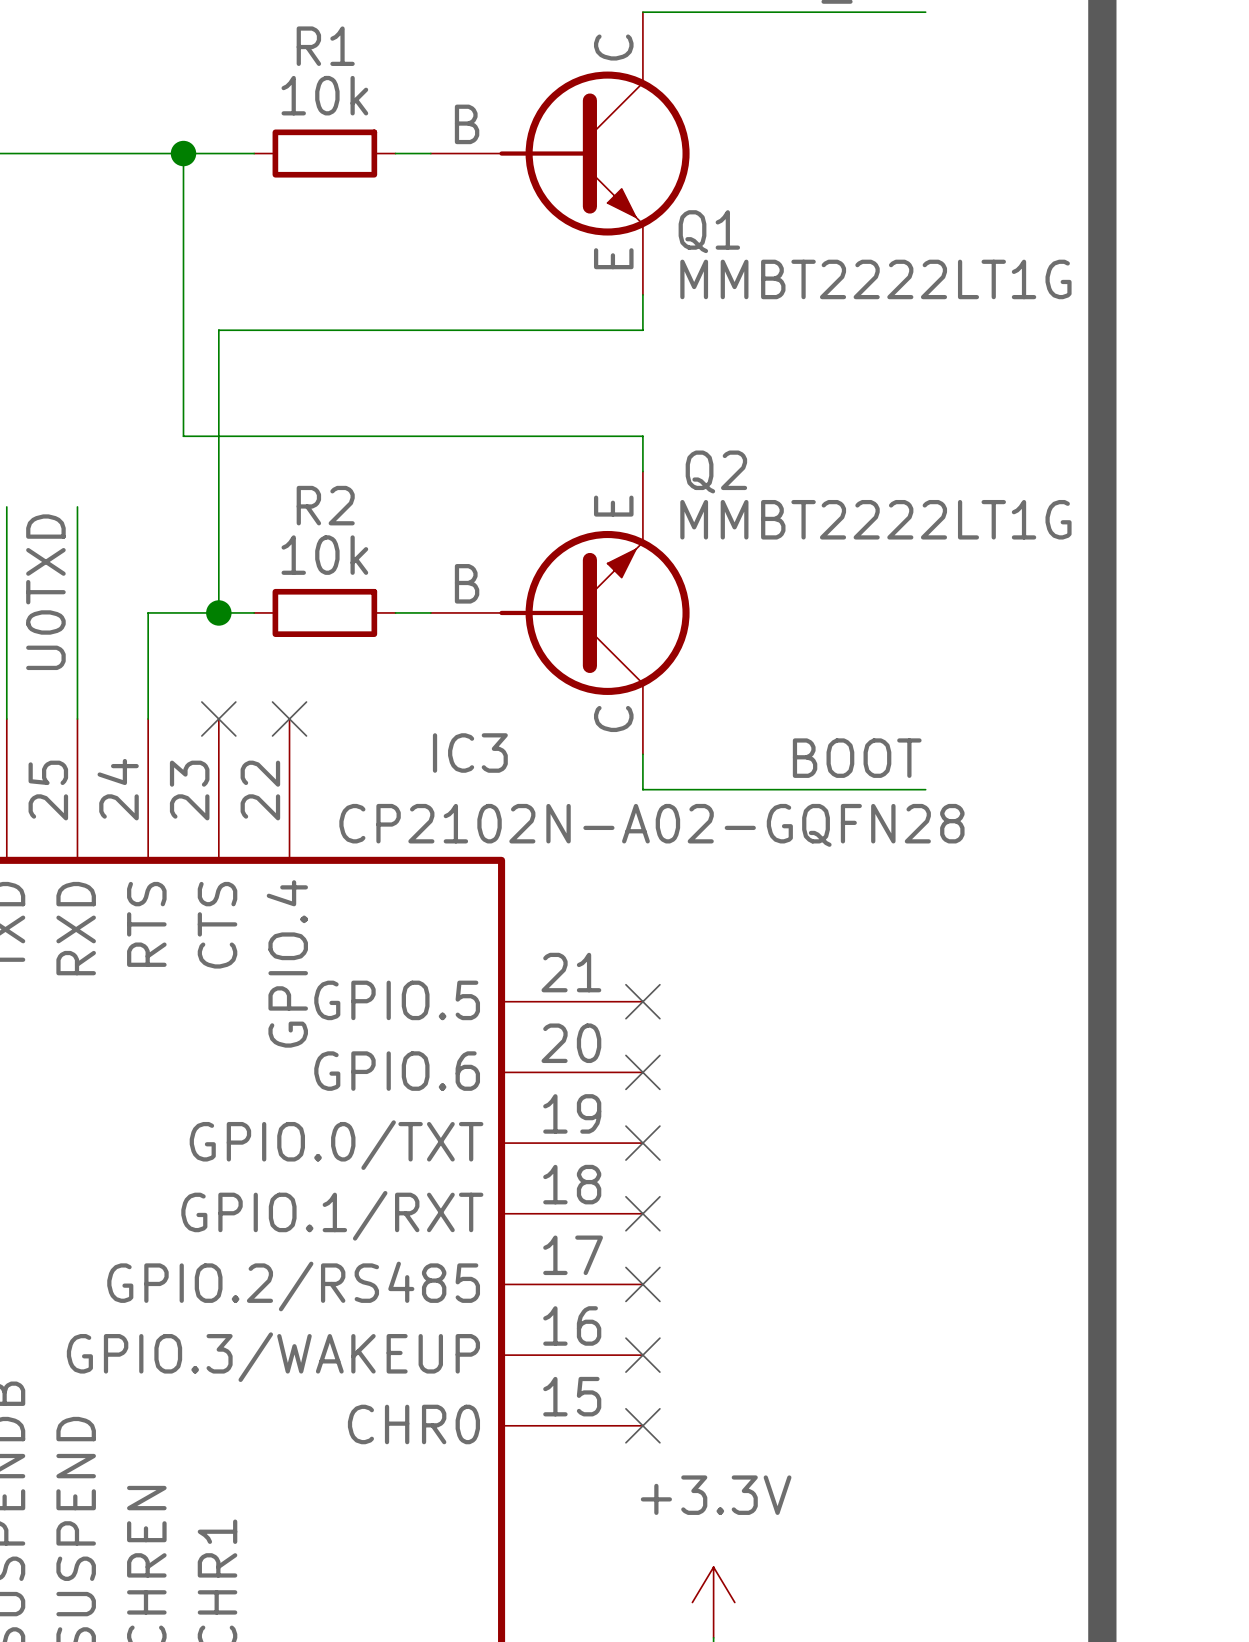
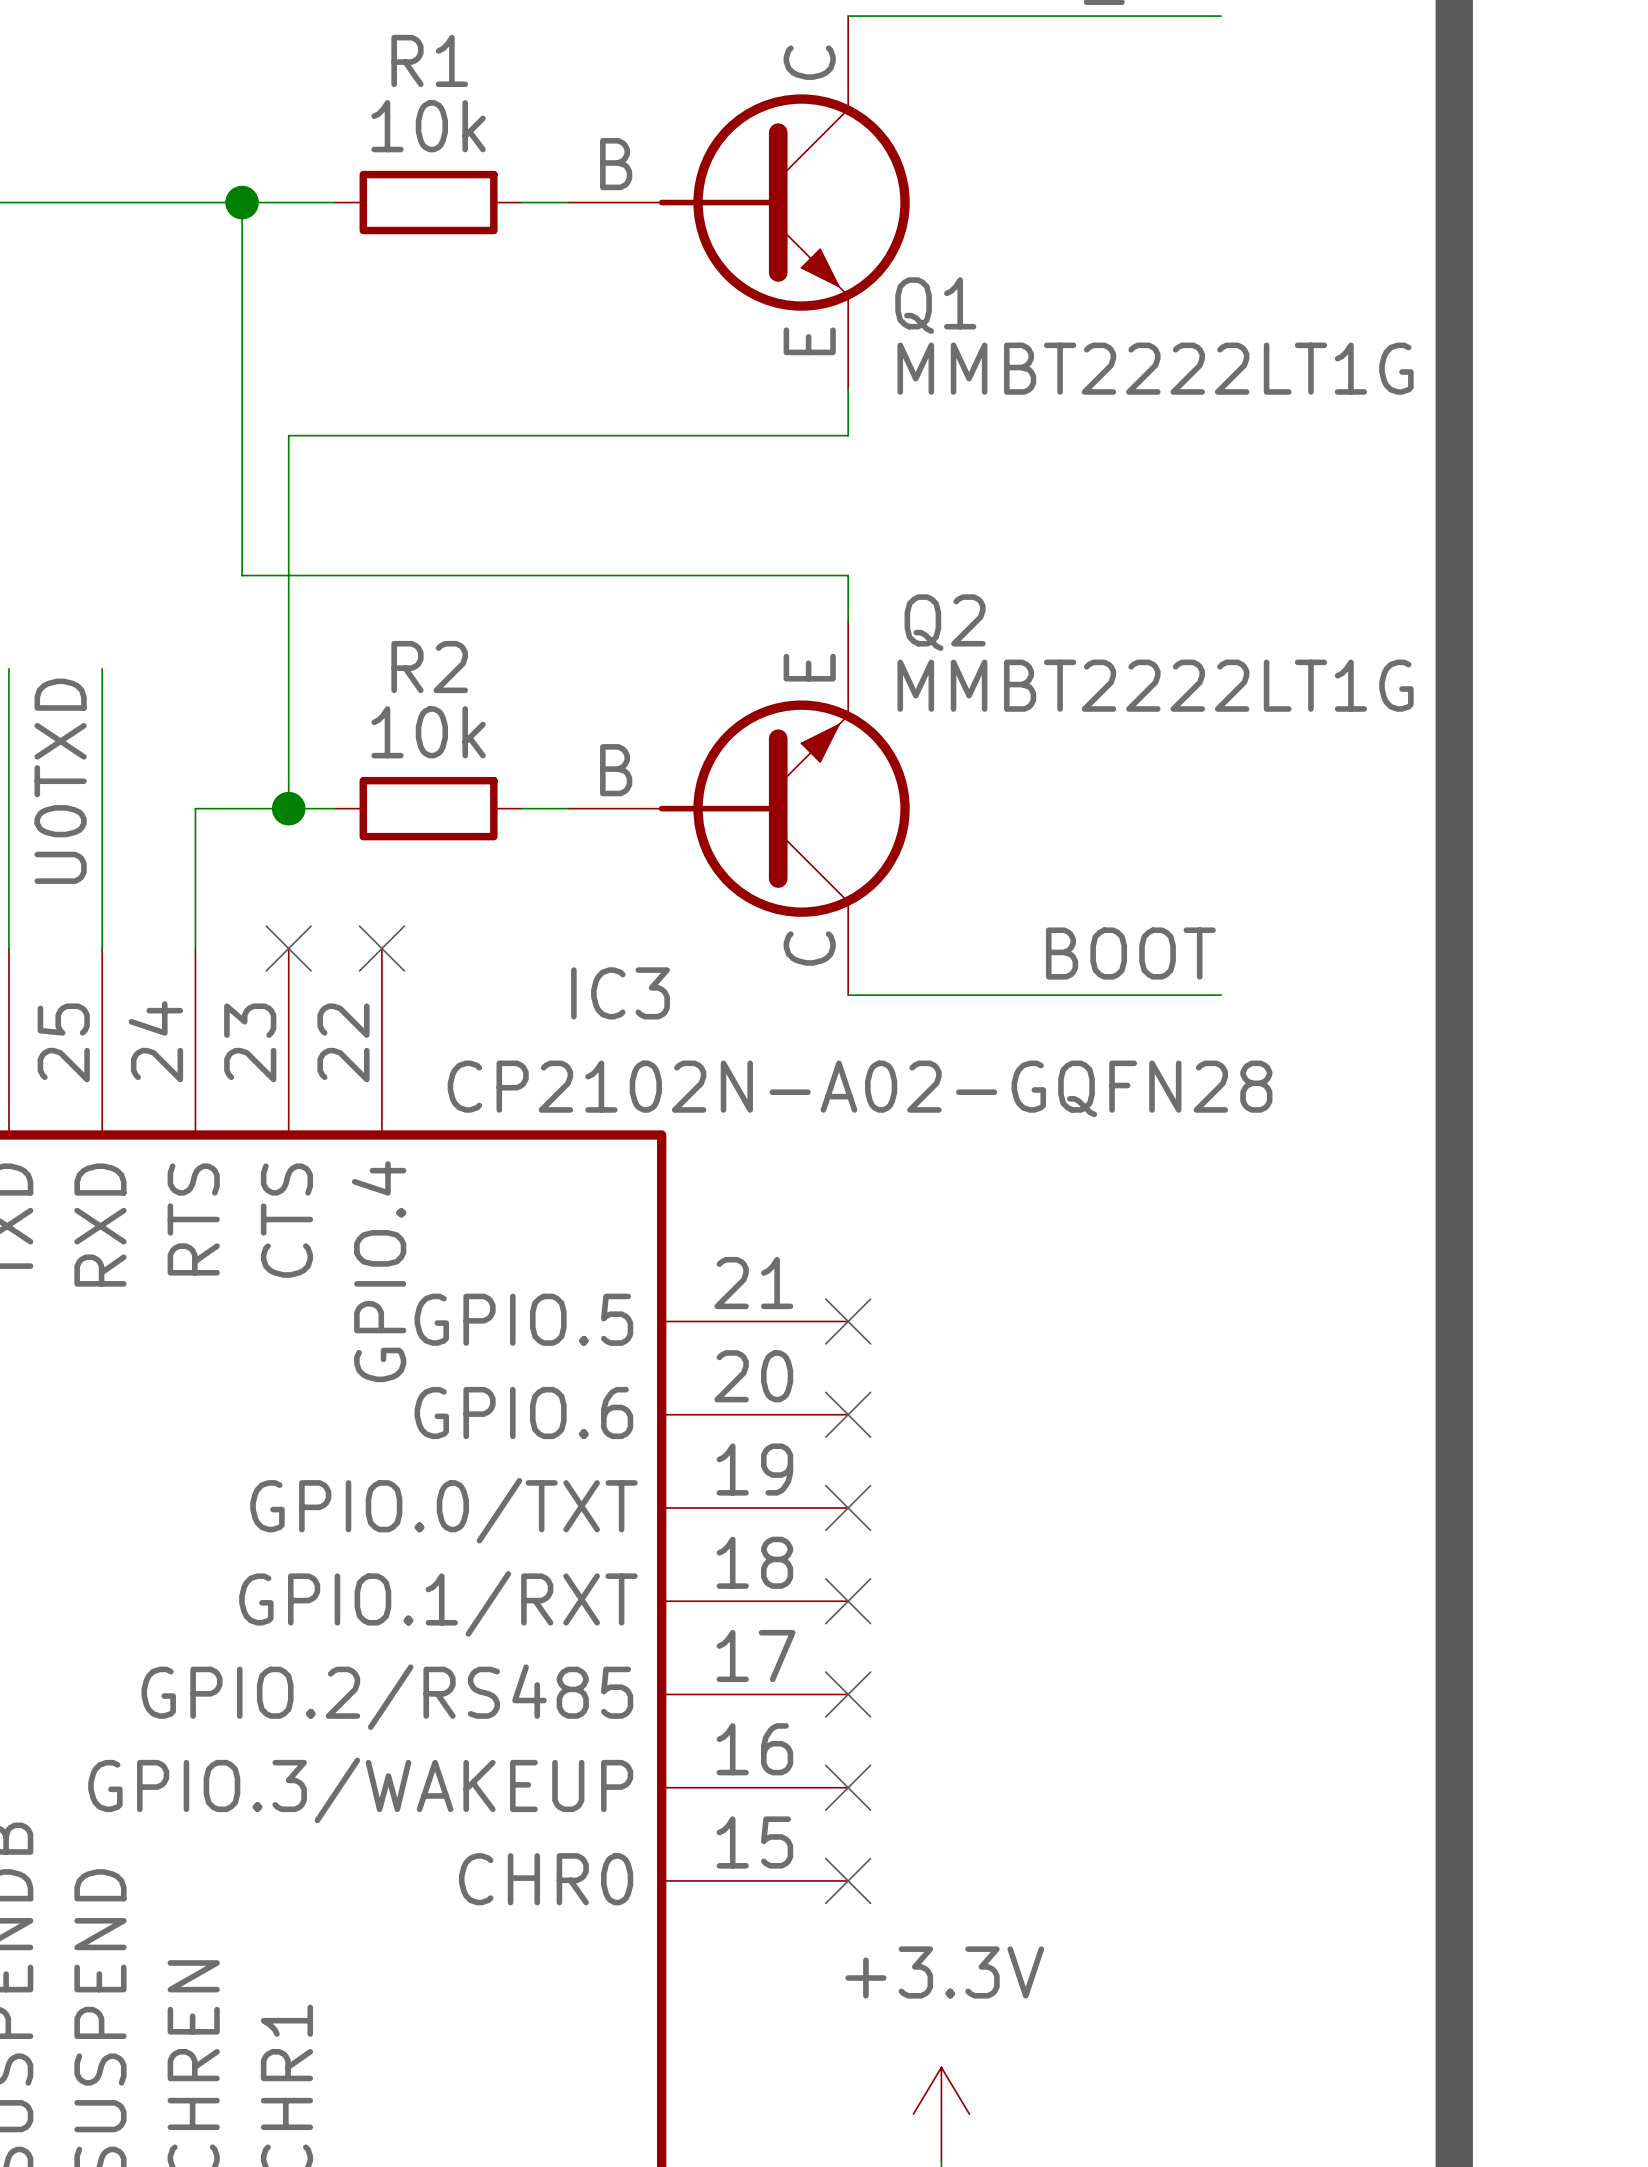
wire: (642, 754) (642, 789) (925, 789) -> (848, 995) (1221, 995)
label position: BOOT (857, 758) -> BOOT (1130, 953)

